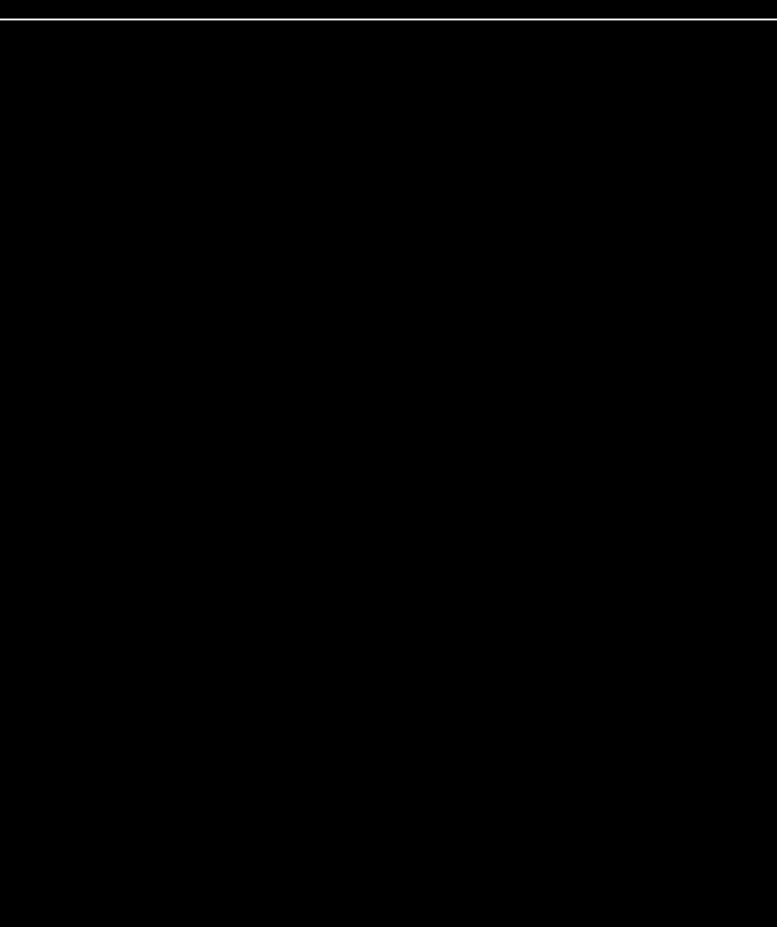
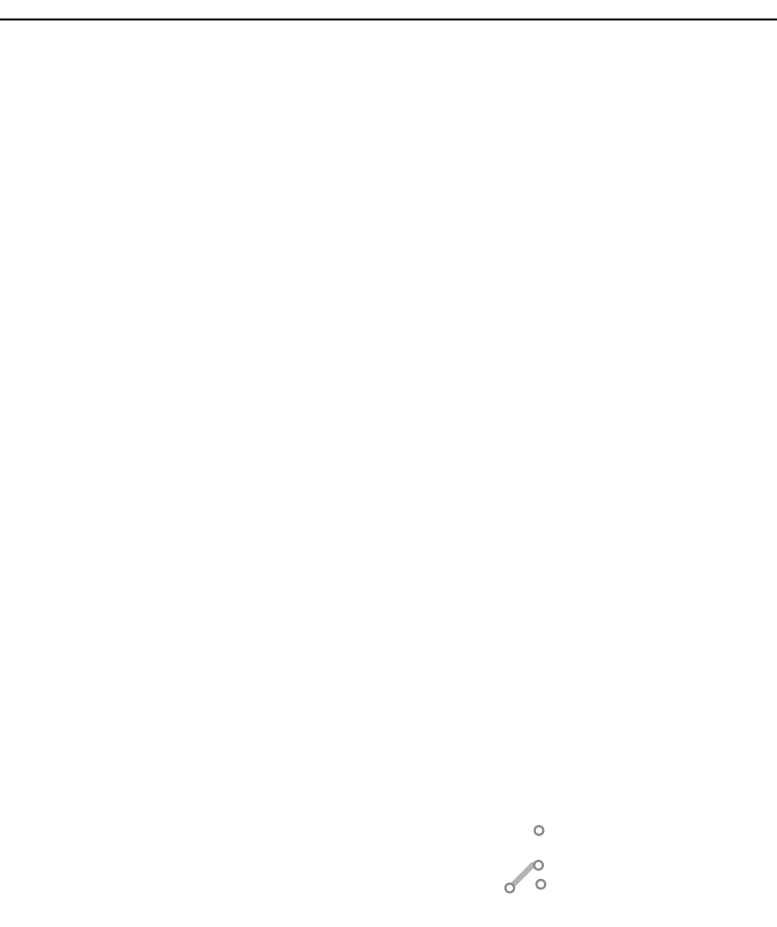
via: none -> (538, 830)
track: none -> (538, 865) (532, 865) (509, 888)
via: none -> (538, 865)
via: none -> (540, 884)
via: none -> (509, 888)

